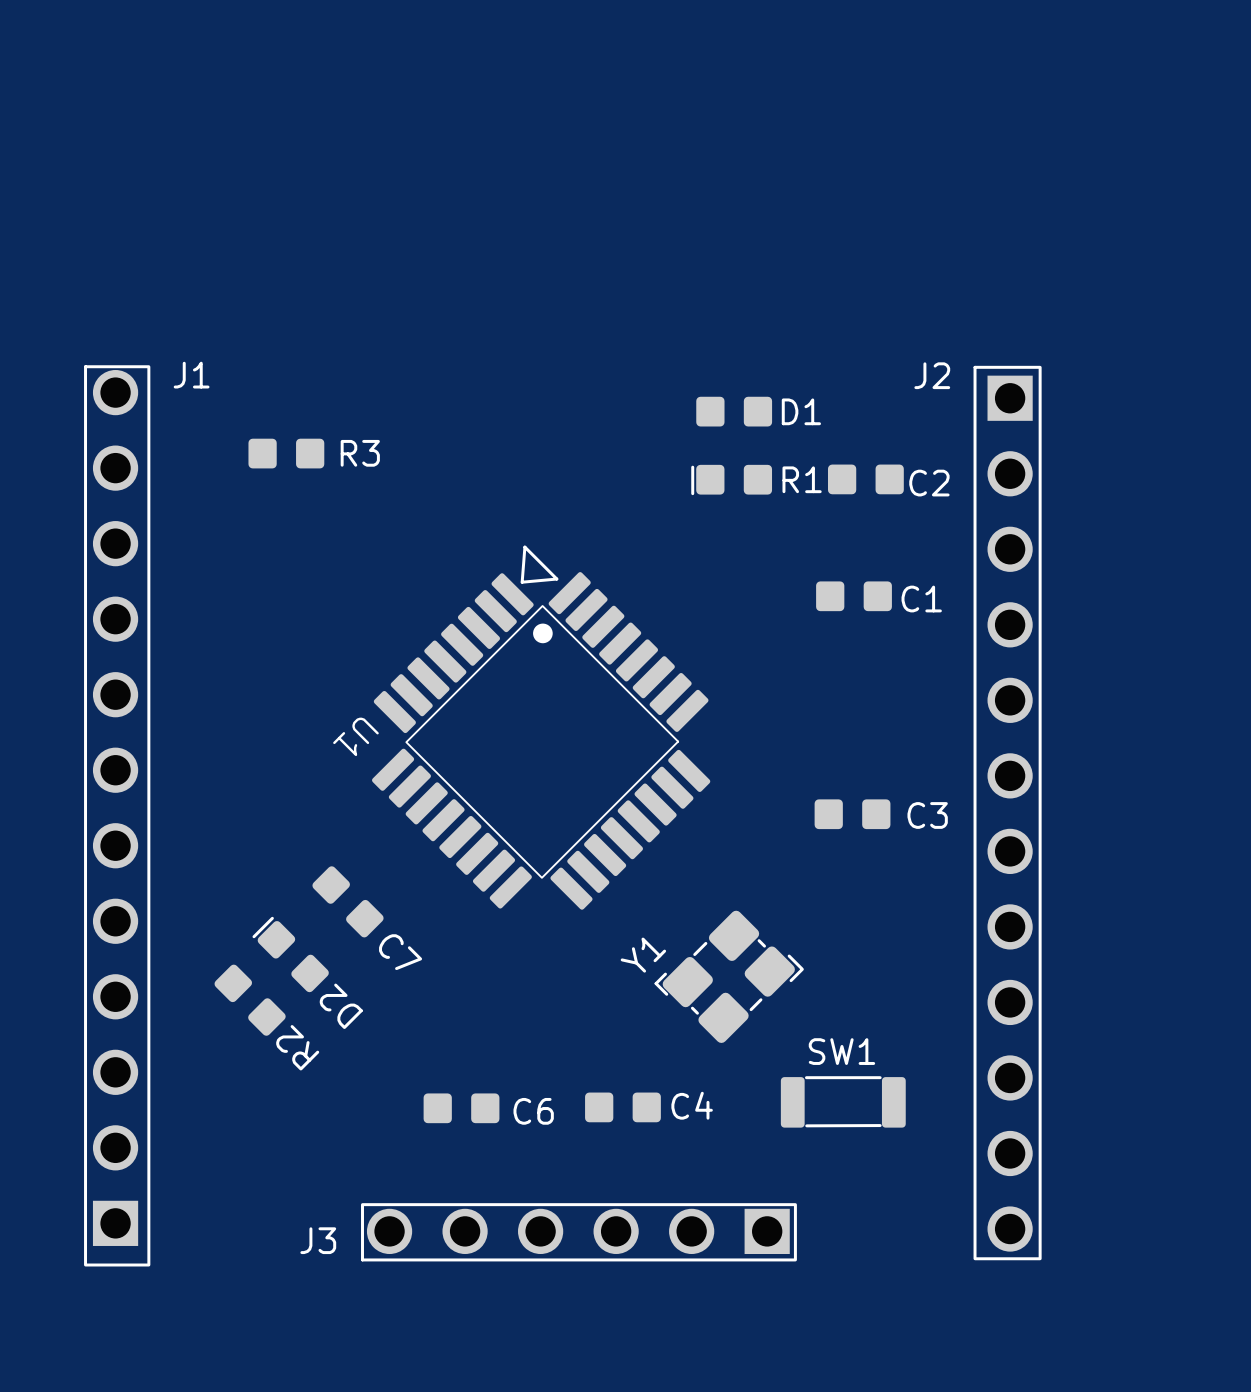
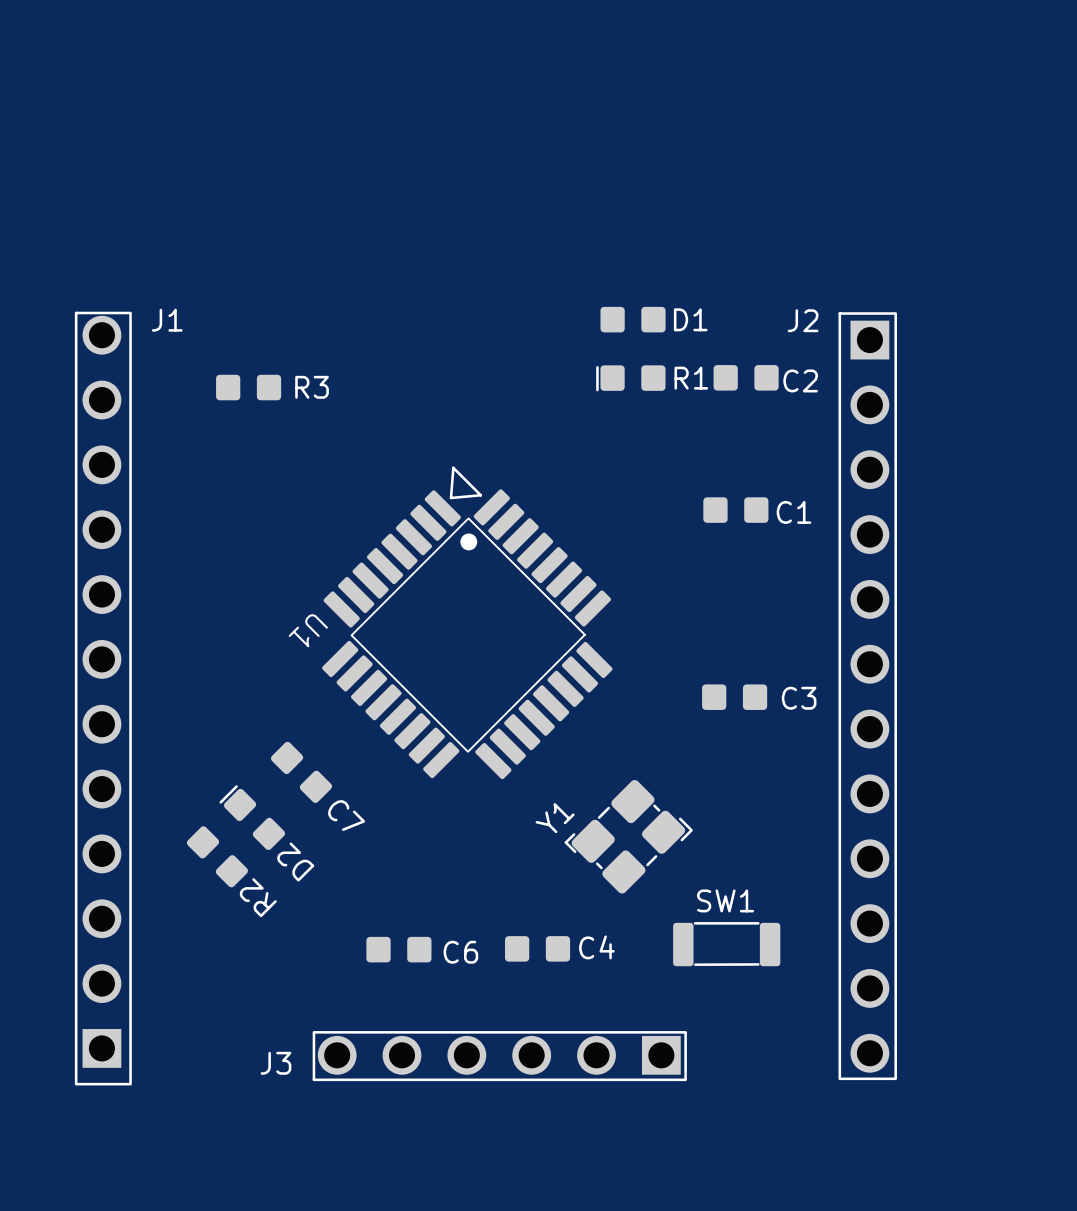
part position: (734, 411) -> (633, 319)
line: (692, 467) (692, 493) -> (597, 367) (597, 390)
part position: (734, 479) -> (632, 378)
part position: (865, 479) -> (746, 377)

